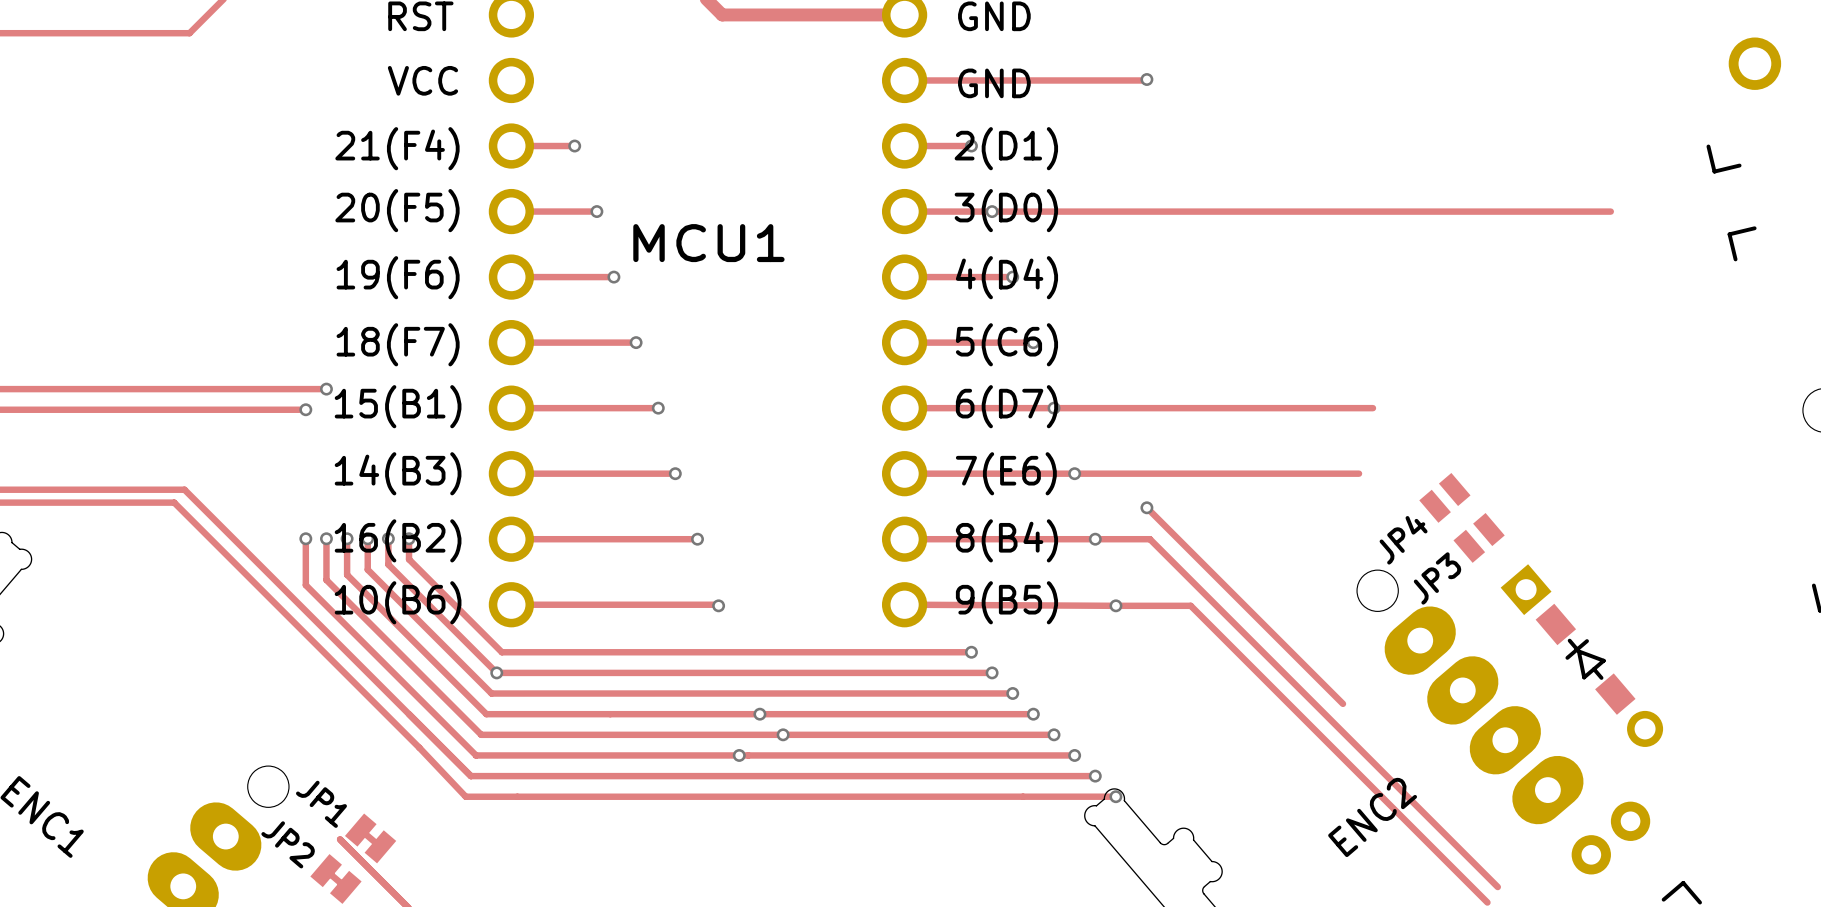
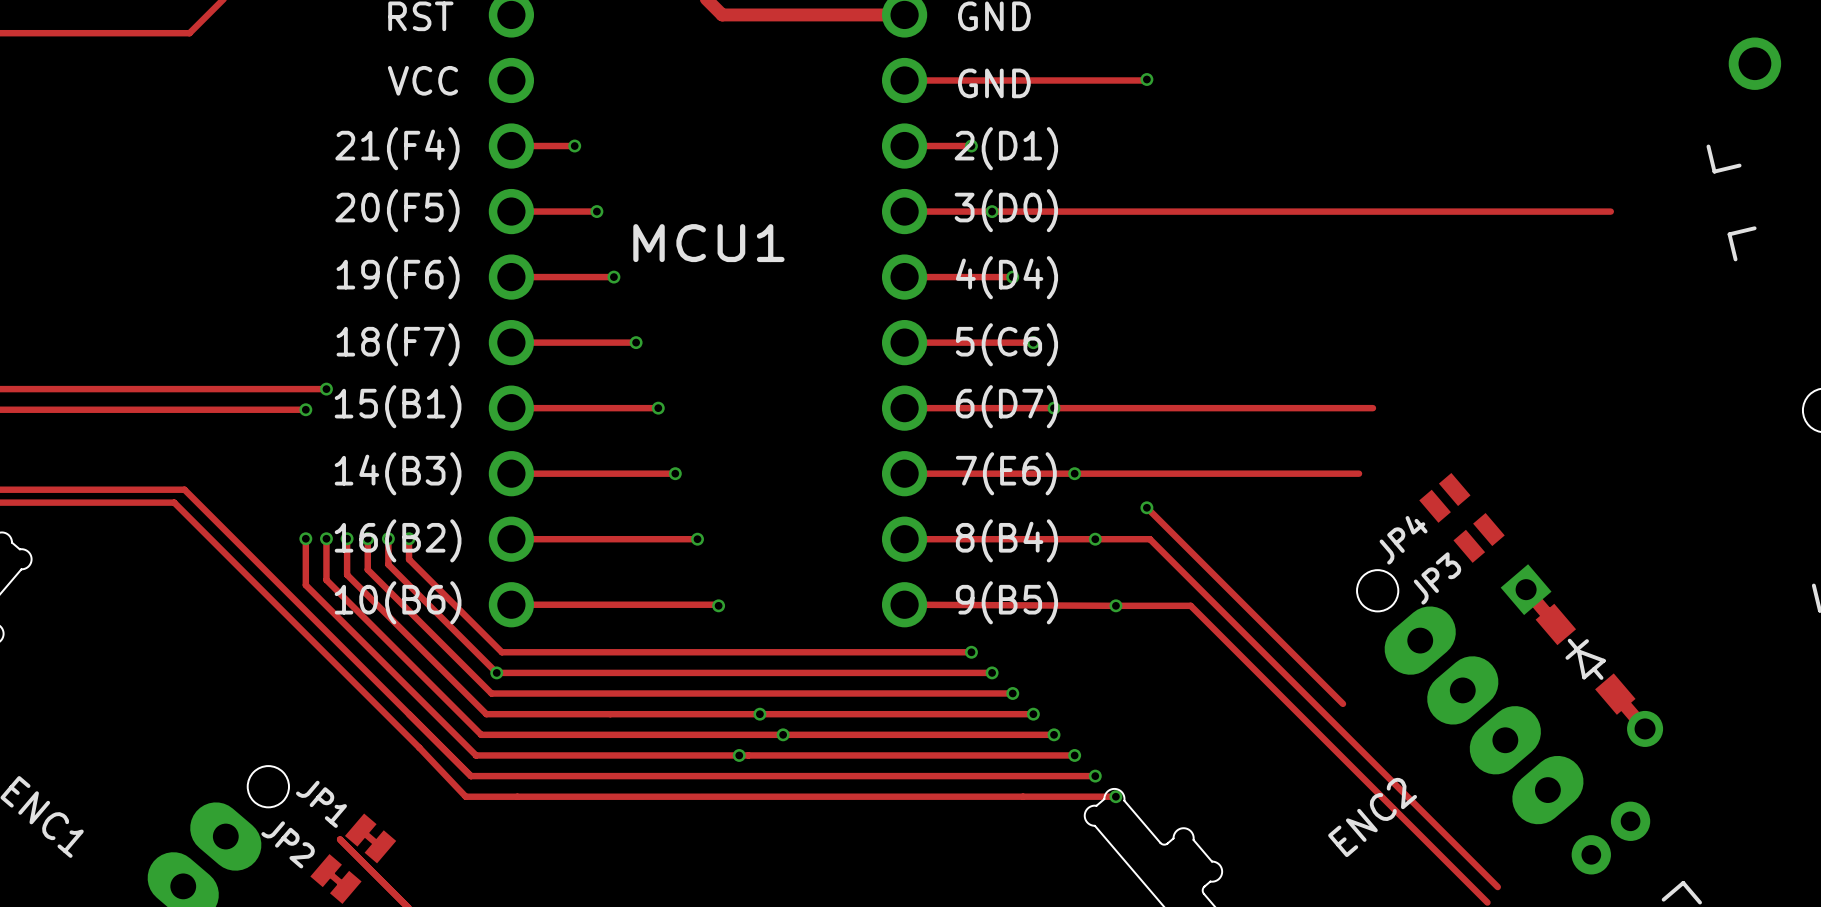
part footprint: [1500, 564, 1664, 747] -> [1500, 564, 1664, 747]

